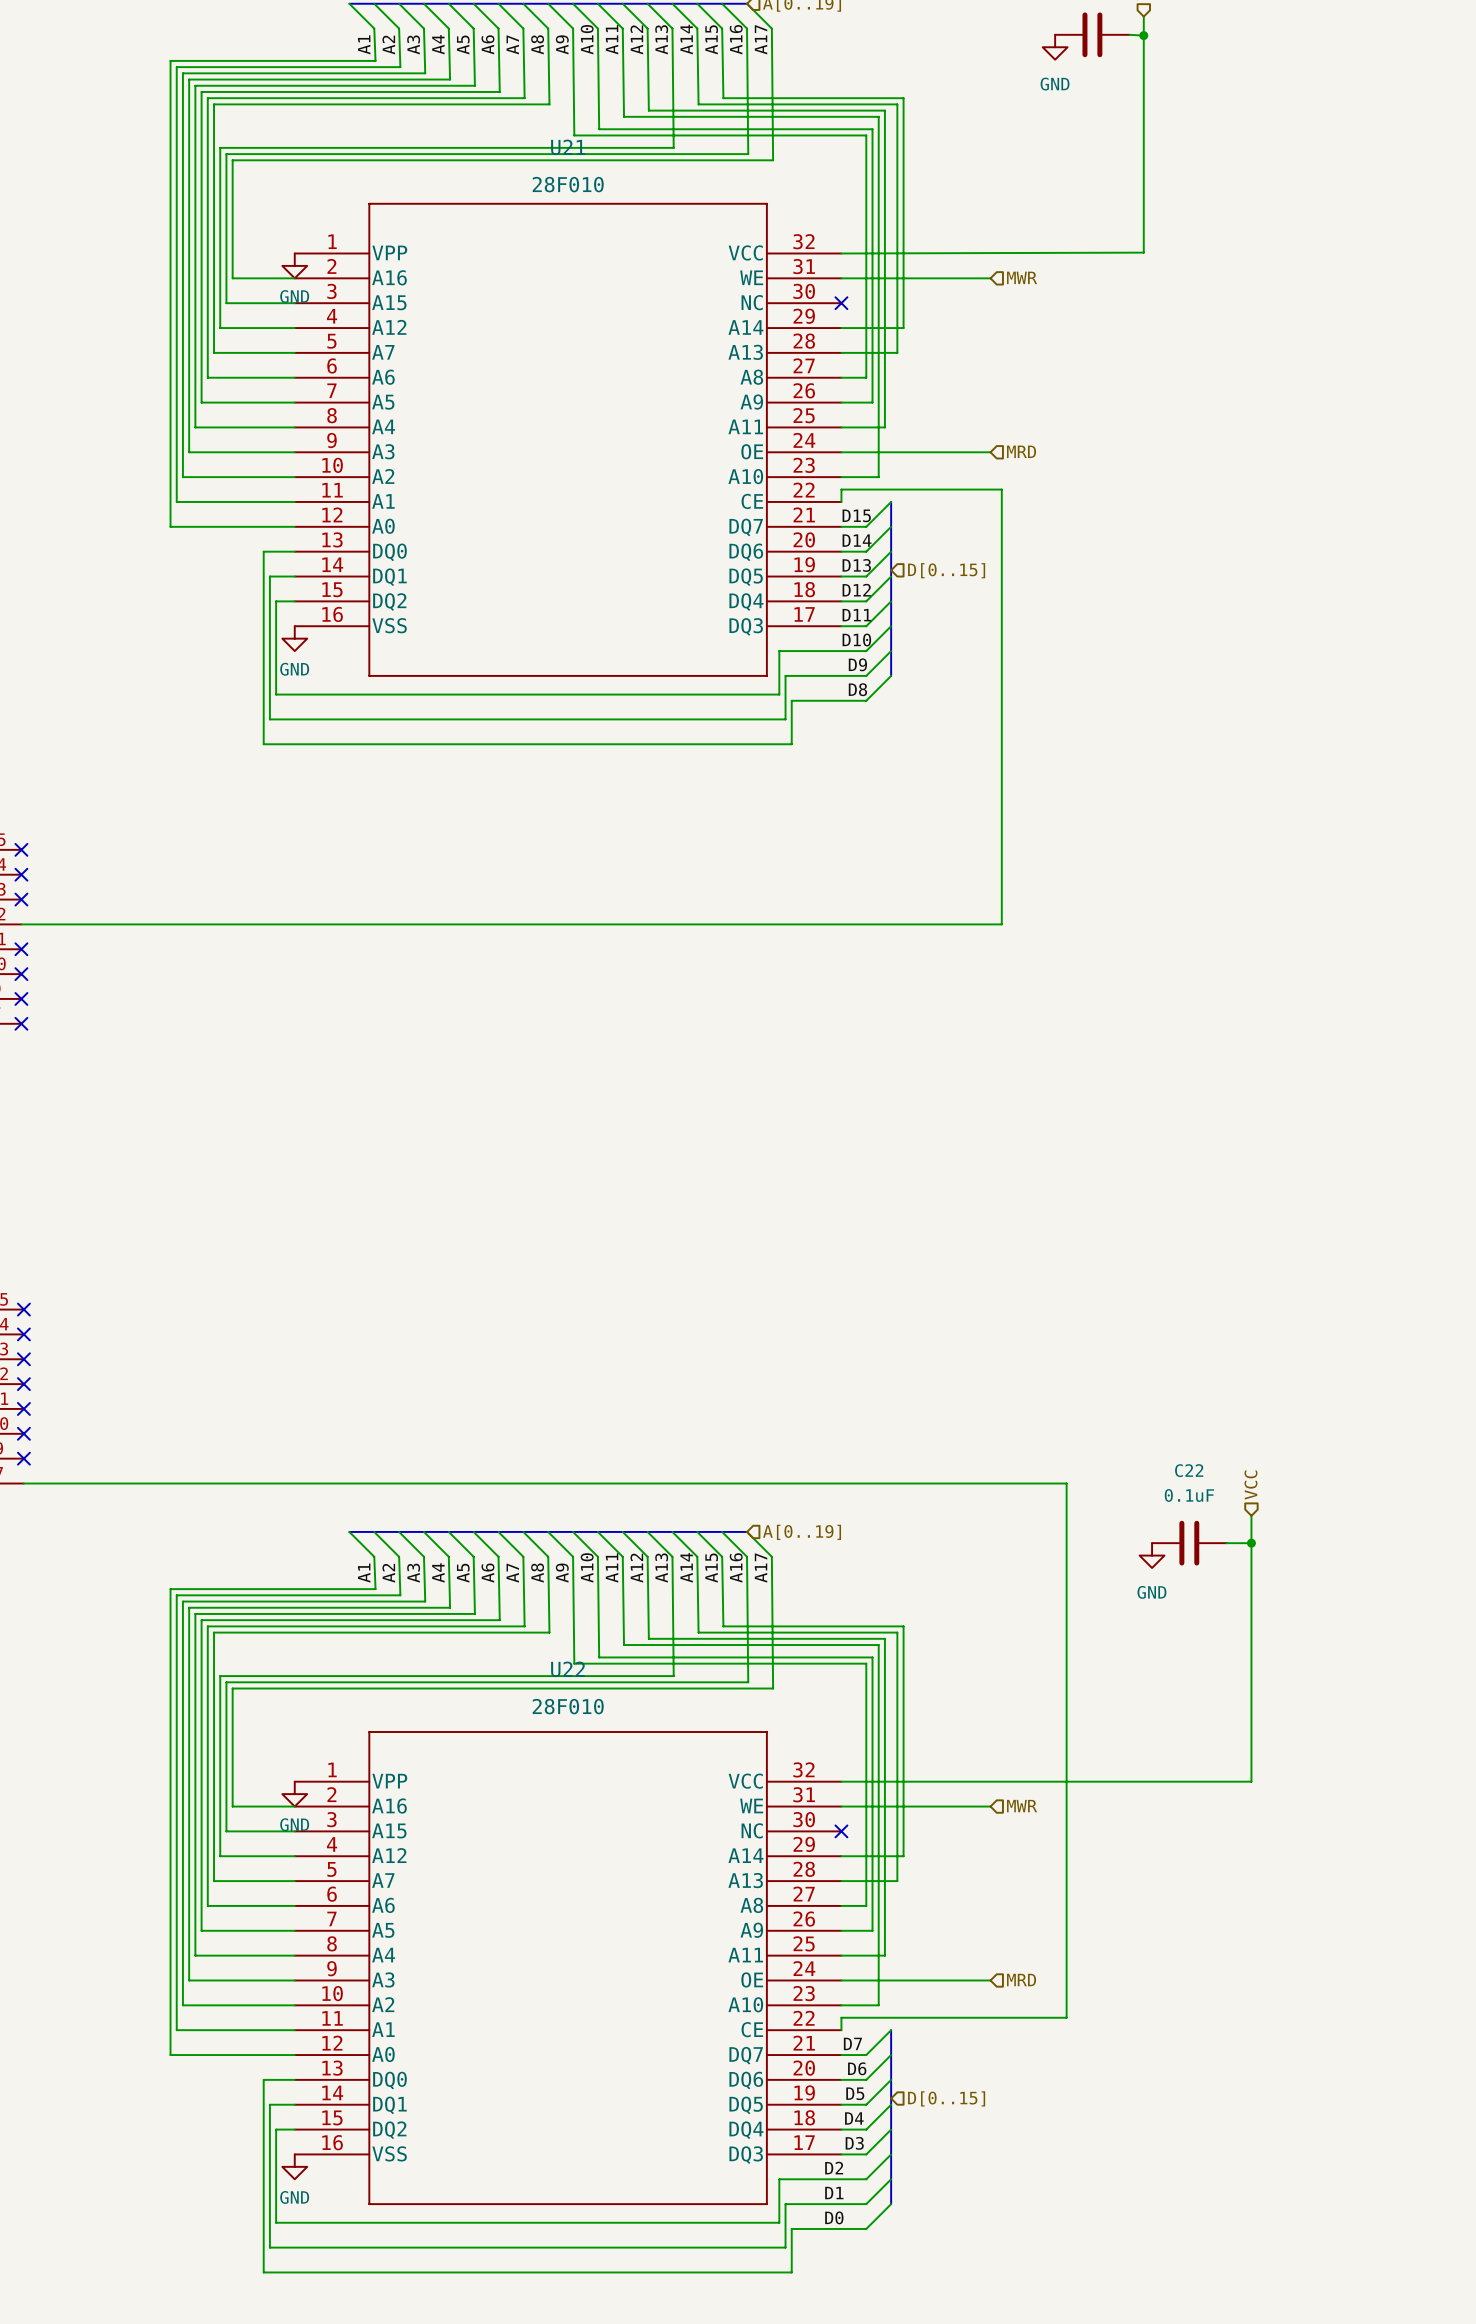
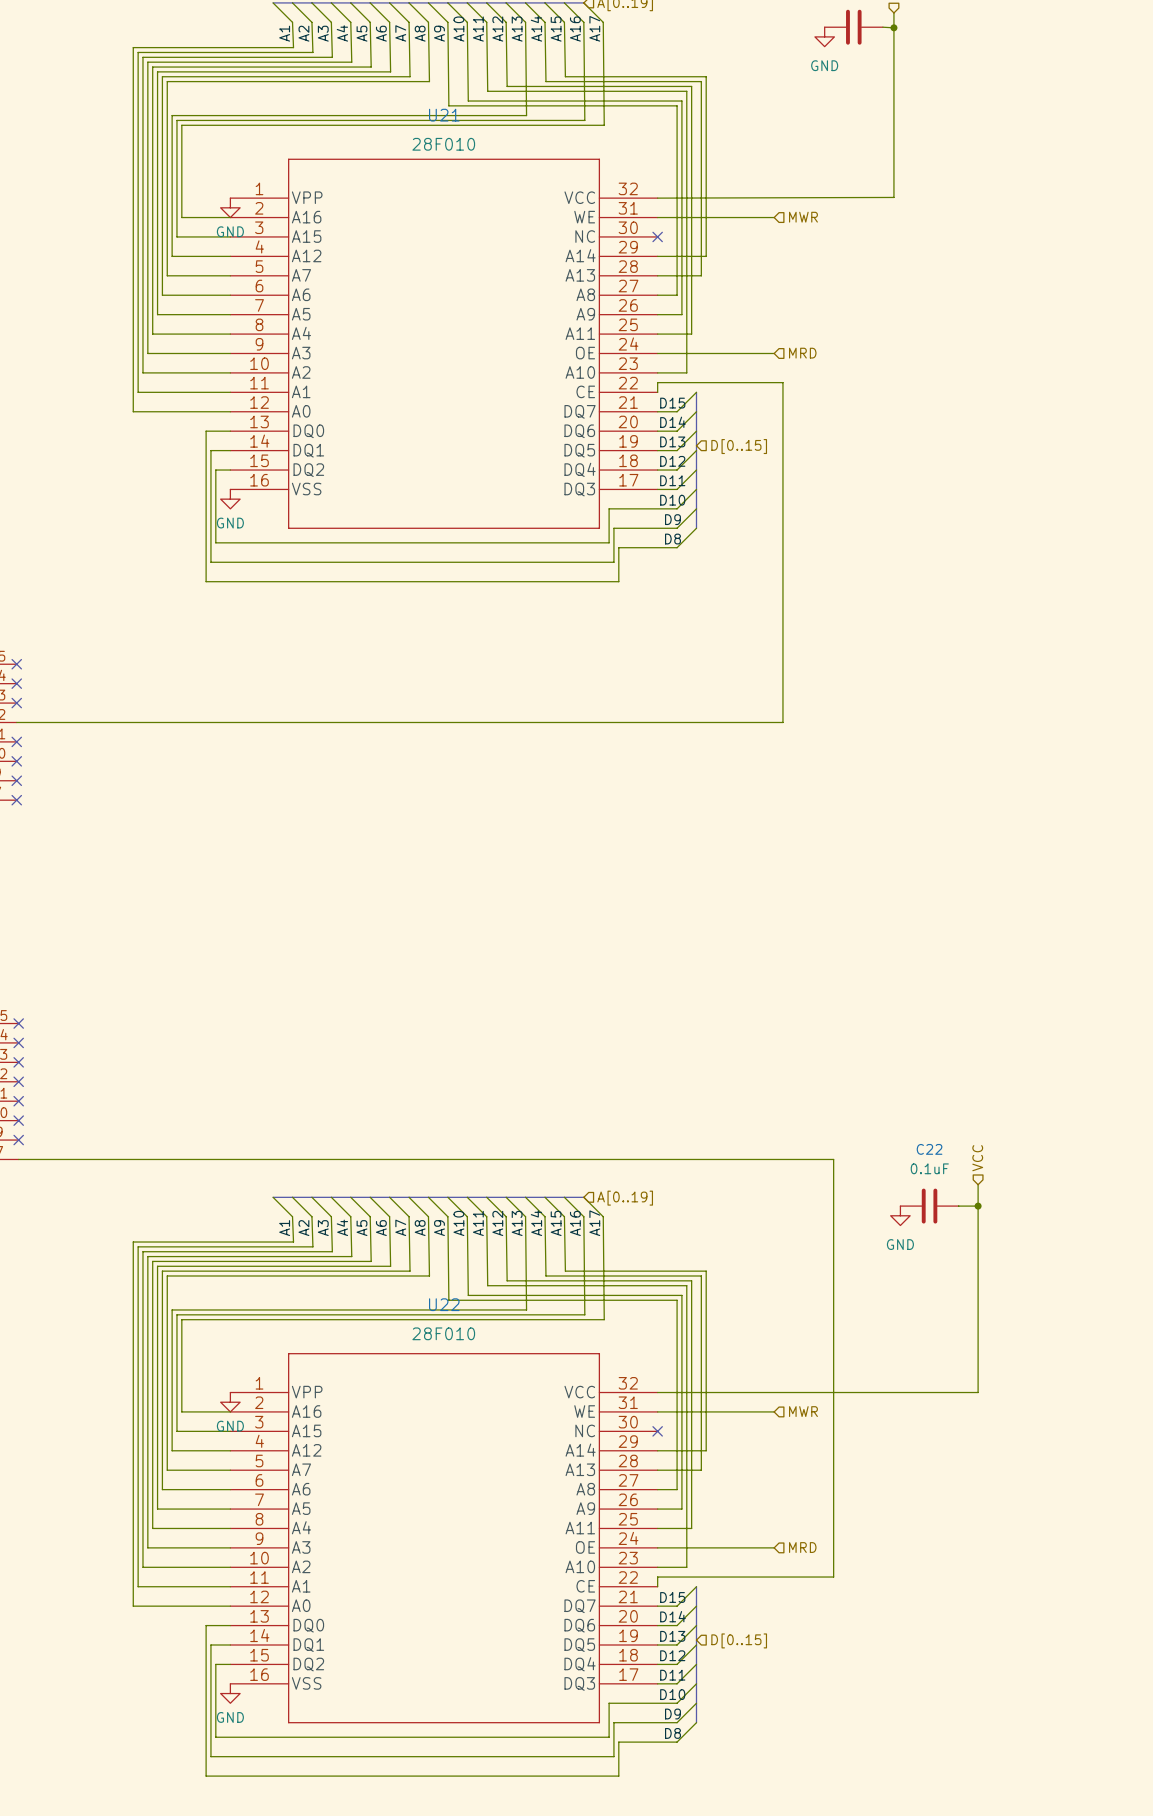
label: D7 (852, 2043) -> D15 (672, 1597)
label: D6 (857, 2068) -> D14 (672, 1616)
label: D5 (855, 2093) -> D13 (672, 1636)
label: D4 (854, 2118) -> D12 (672, 1655)
label: D3 (854, 2143) -> D11 (672, 1675)
label: D2 (834, 2168) -> none
label: D1 (834, 2193) -> D10 (672, 1694)
label: none -> D9 (672, 1714)
label: D0 (834, 2217) -> none
label: none -> D8 (672, 1733)

